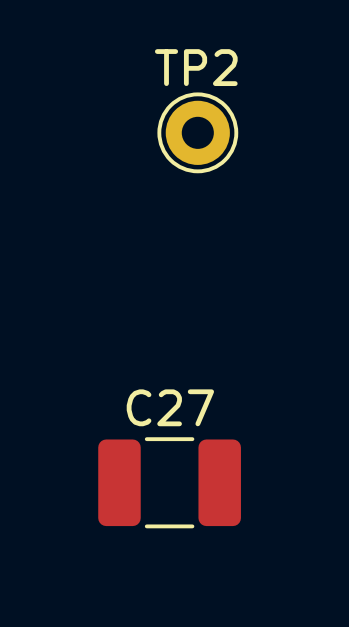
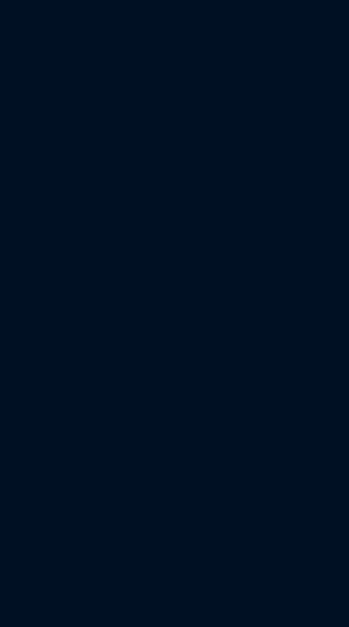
TP2: (197, 132) -> none
C27: (169, 482) -> none

